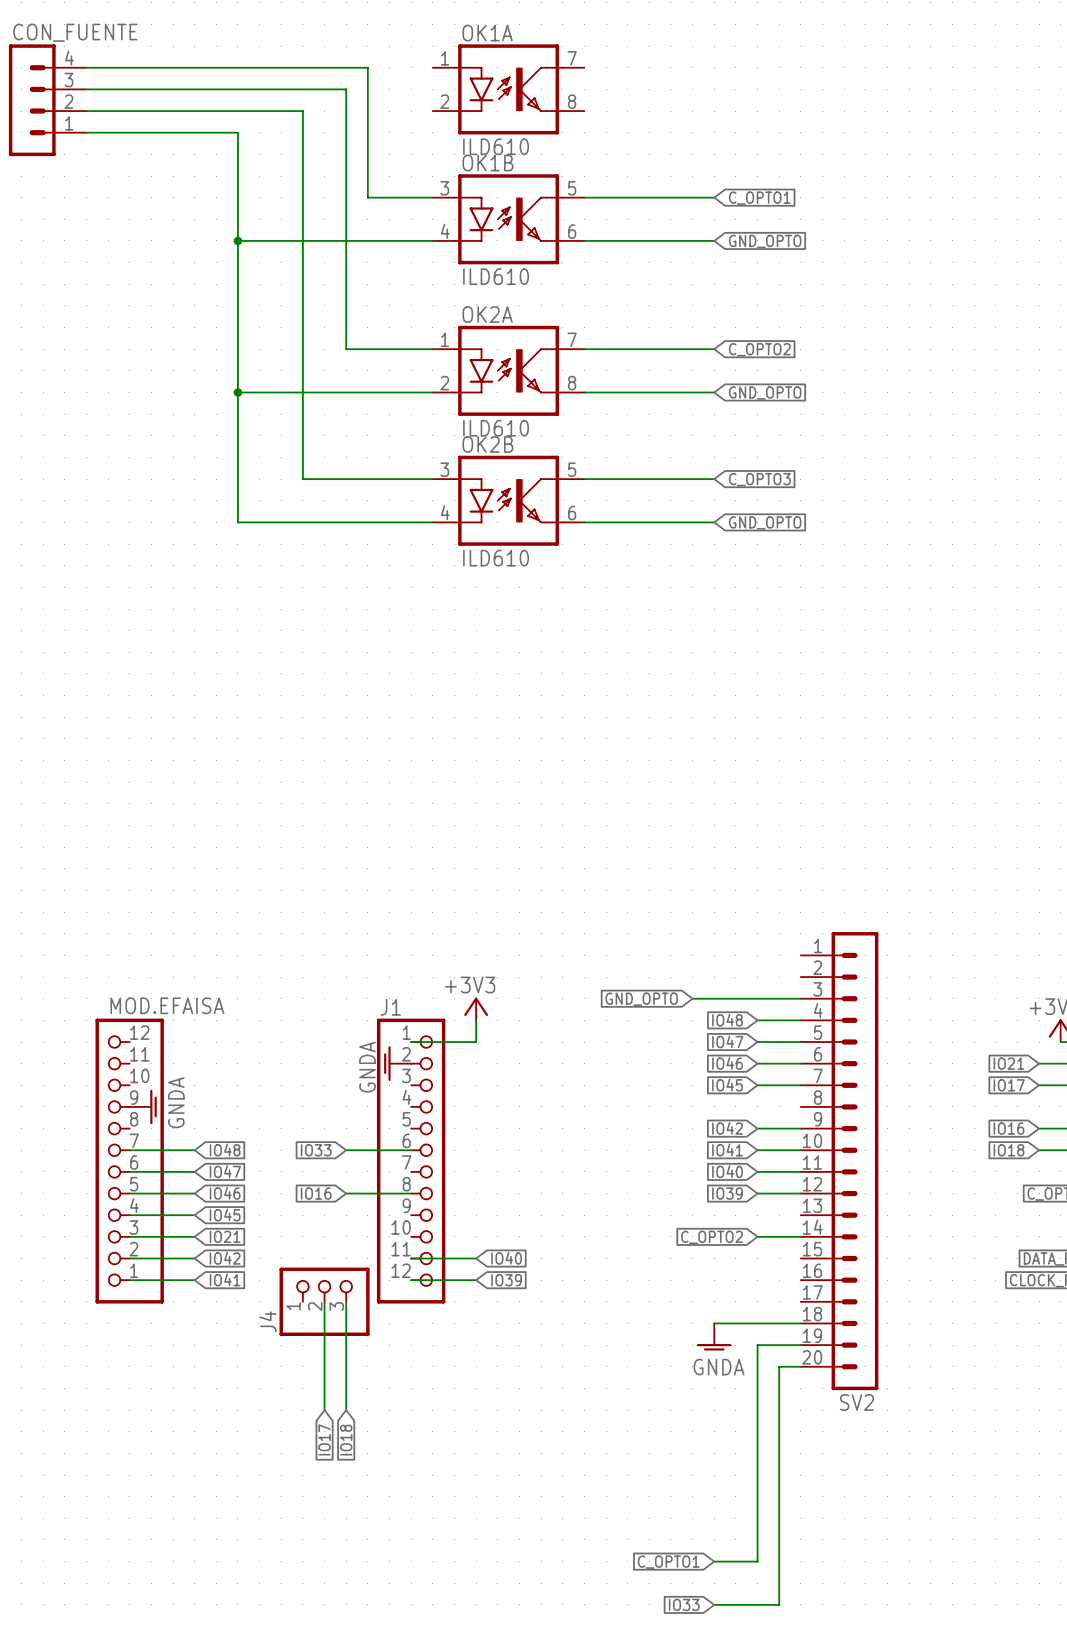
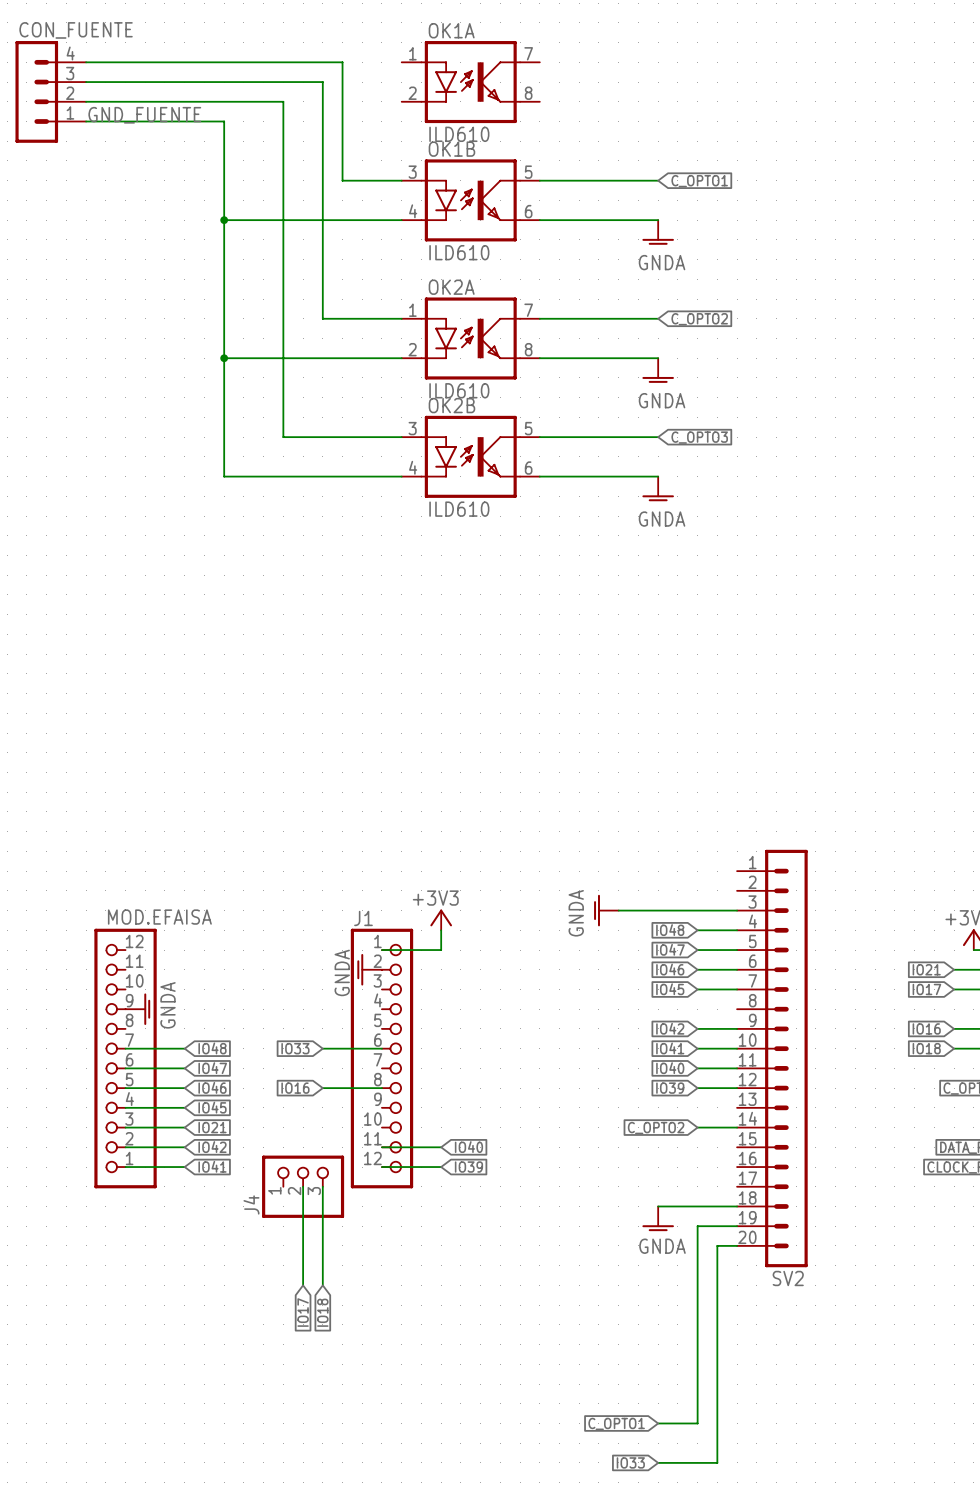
label: none -> GND_FUENTE (144, 115)
global label: GND_OPTO (765, 241) -> none
power symbol: none -> GNDA (658, 232)
global label: GND_OPTO (765, 393) -> none
power symbol: none -> GNDA (658, 370)
global label: GND_OPTO (765, 522) -> none
power symbol: none -> GNDA (658, 488)
power symbol: none -> GNDA (606, 910)
wire: none -> (618, 910) (638, 910)
global label: GND_OPTO (641, 999) -> none

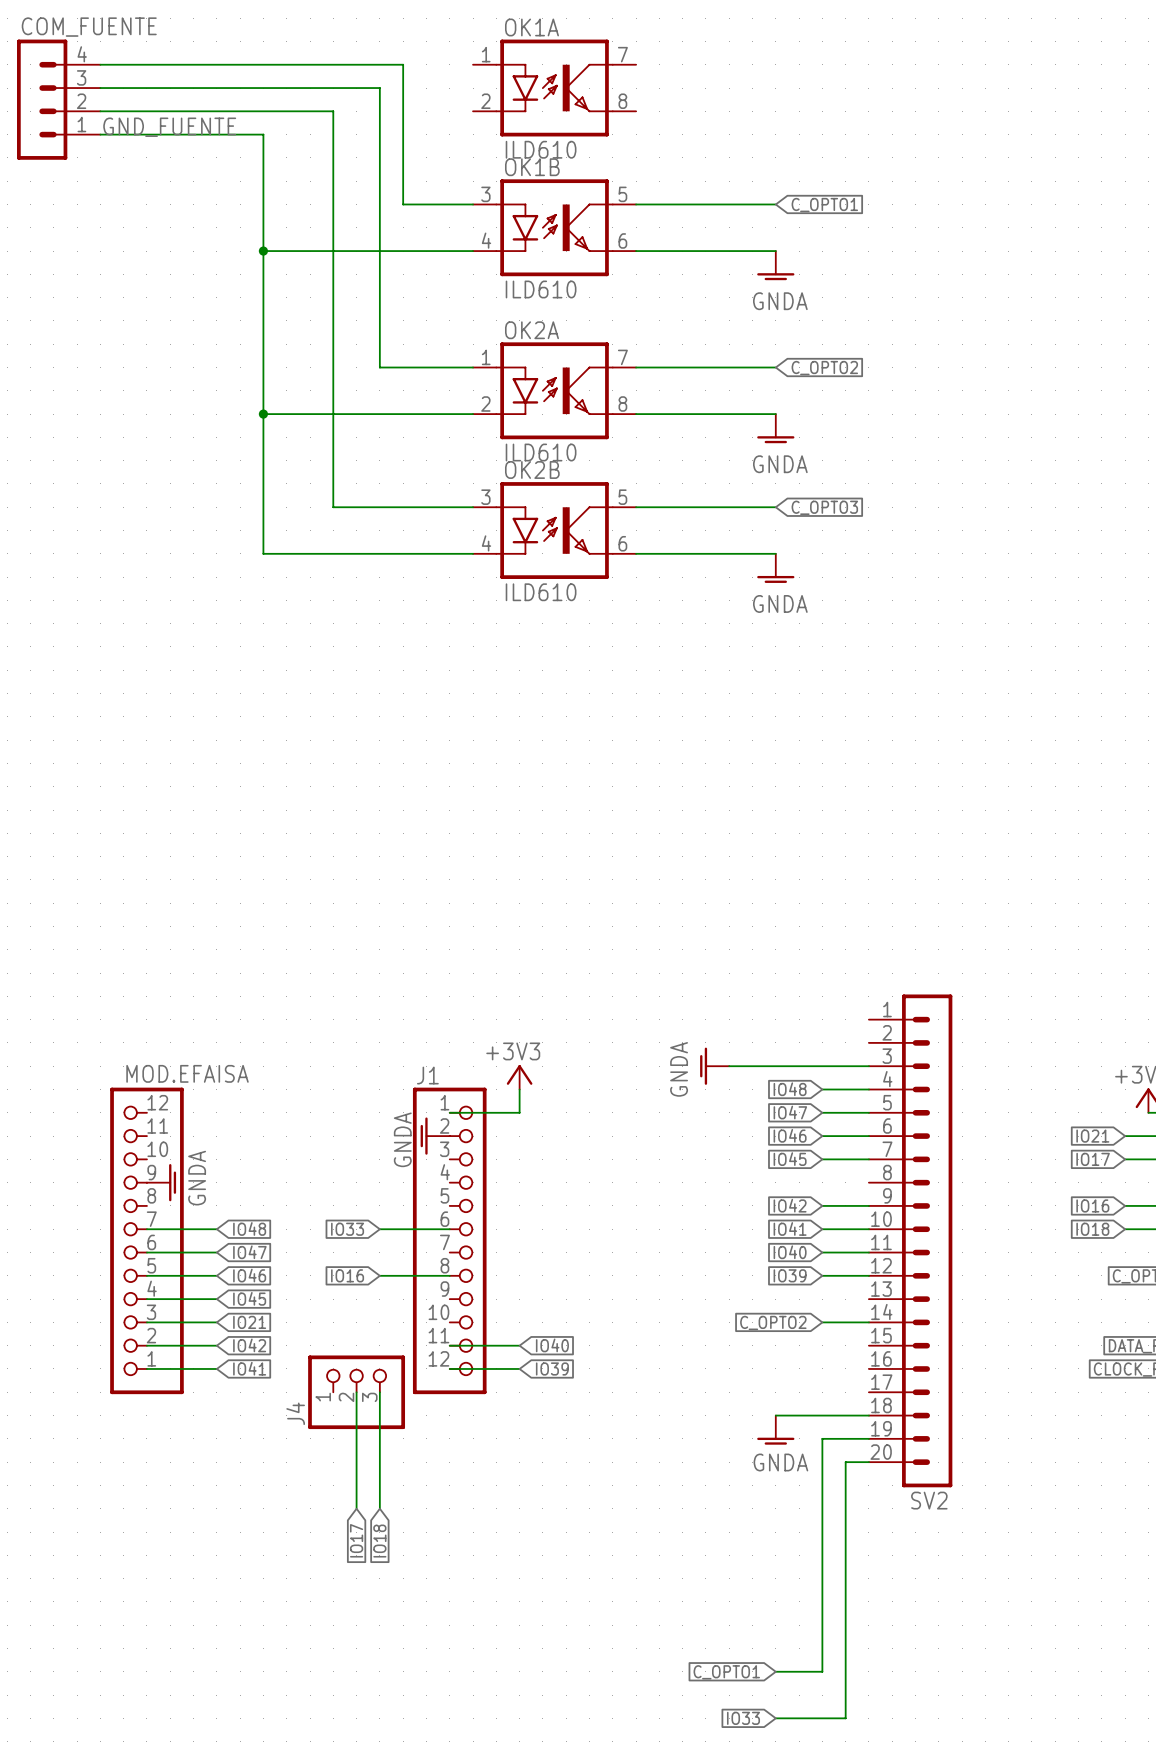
CON_FUENTE name: CON_FUENTE (76, 30) -> COM_FUENTE (89, 27)

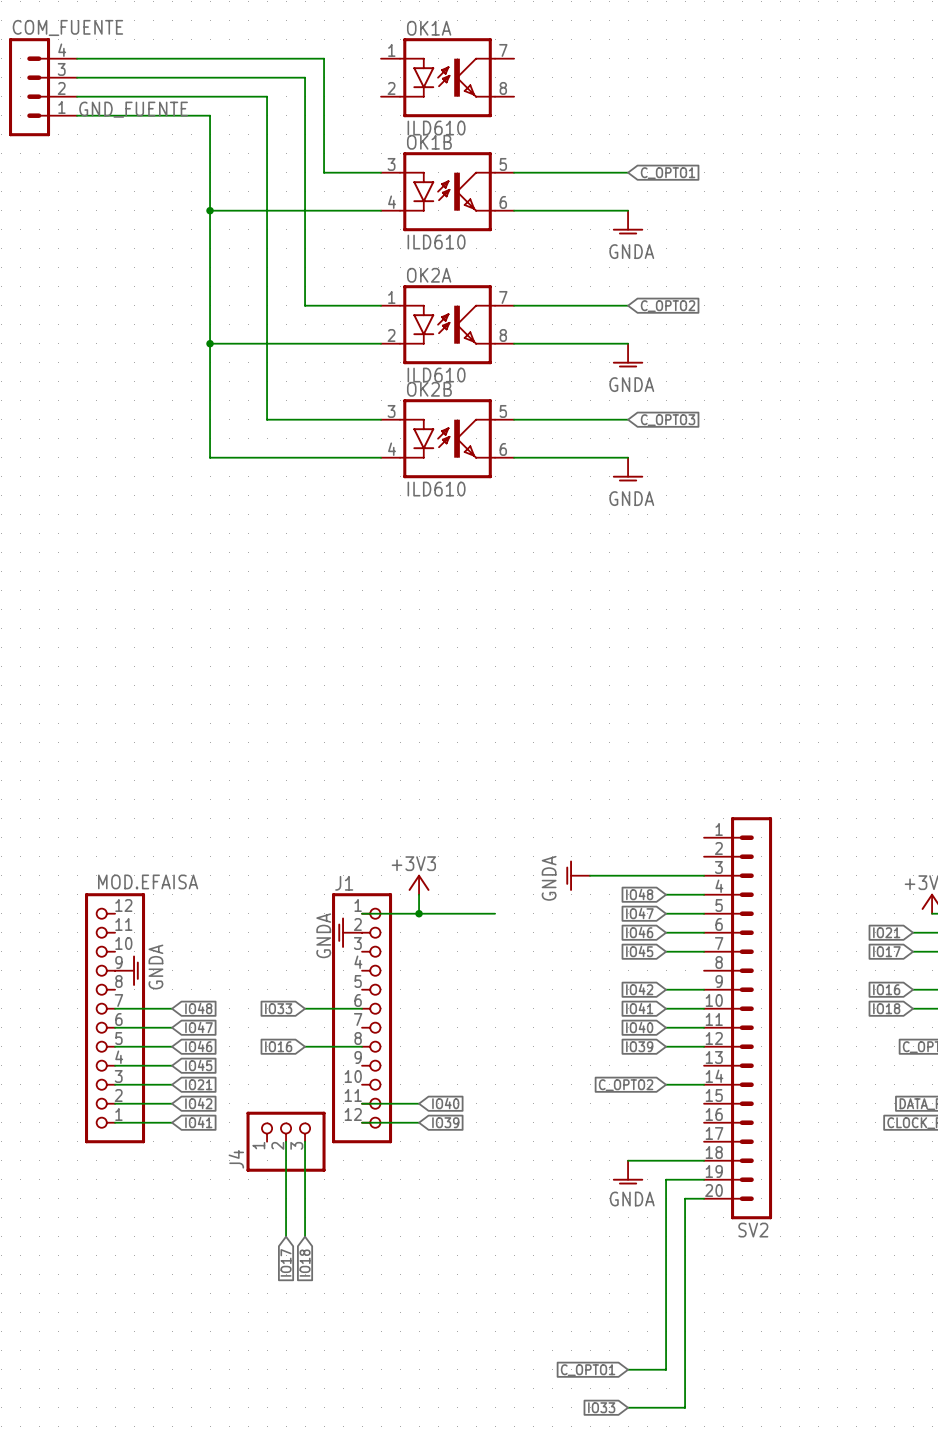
wire: none -> (419, 913) (495, 913)
junction: none -> (419, 913)

